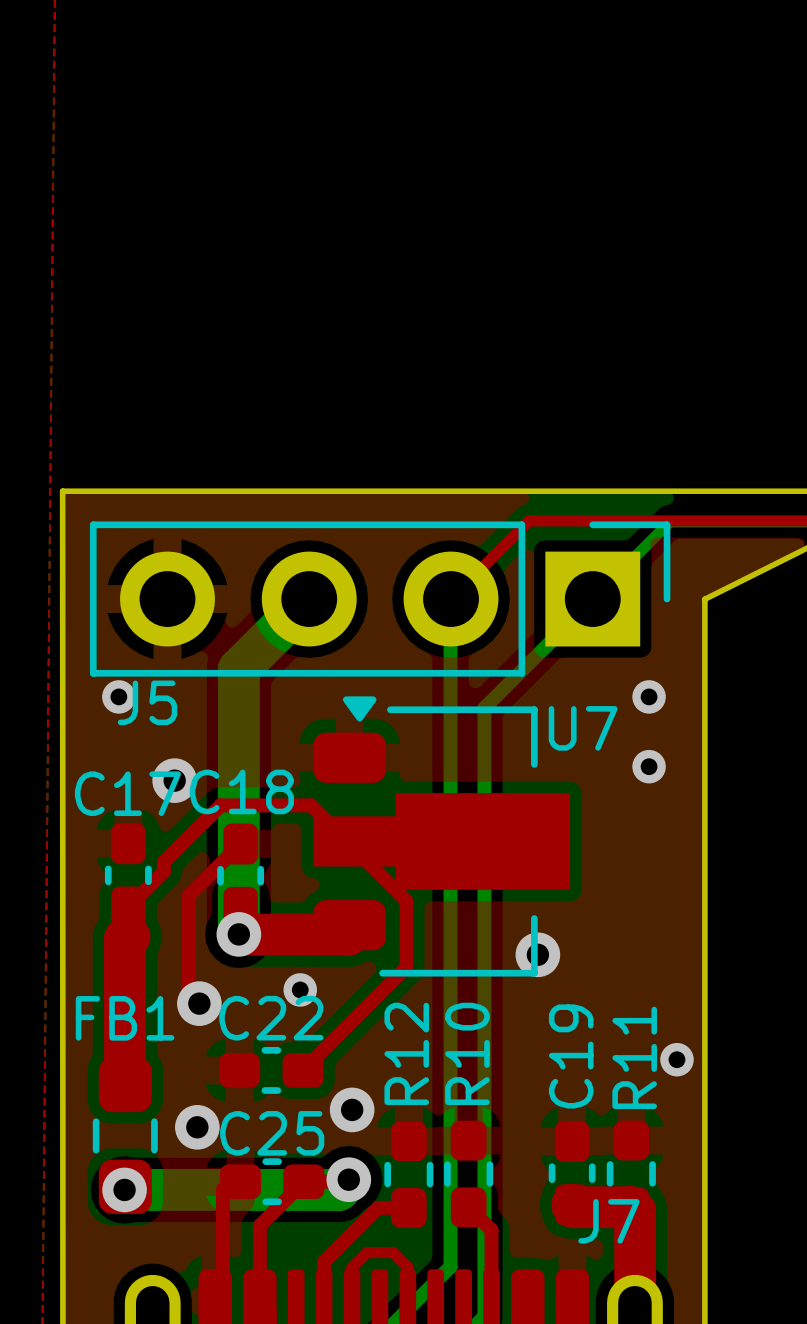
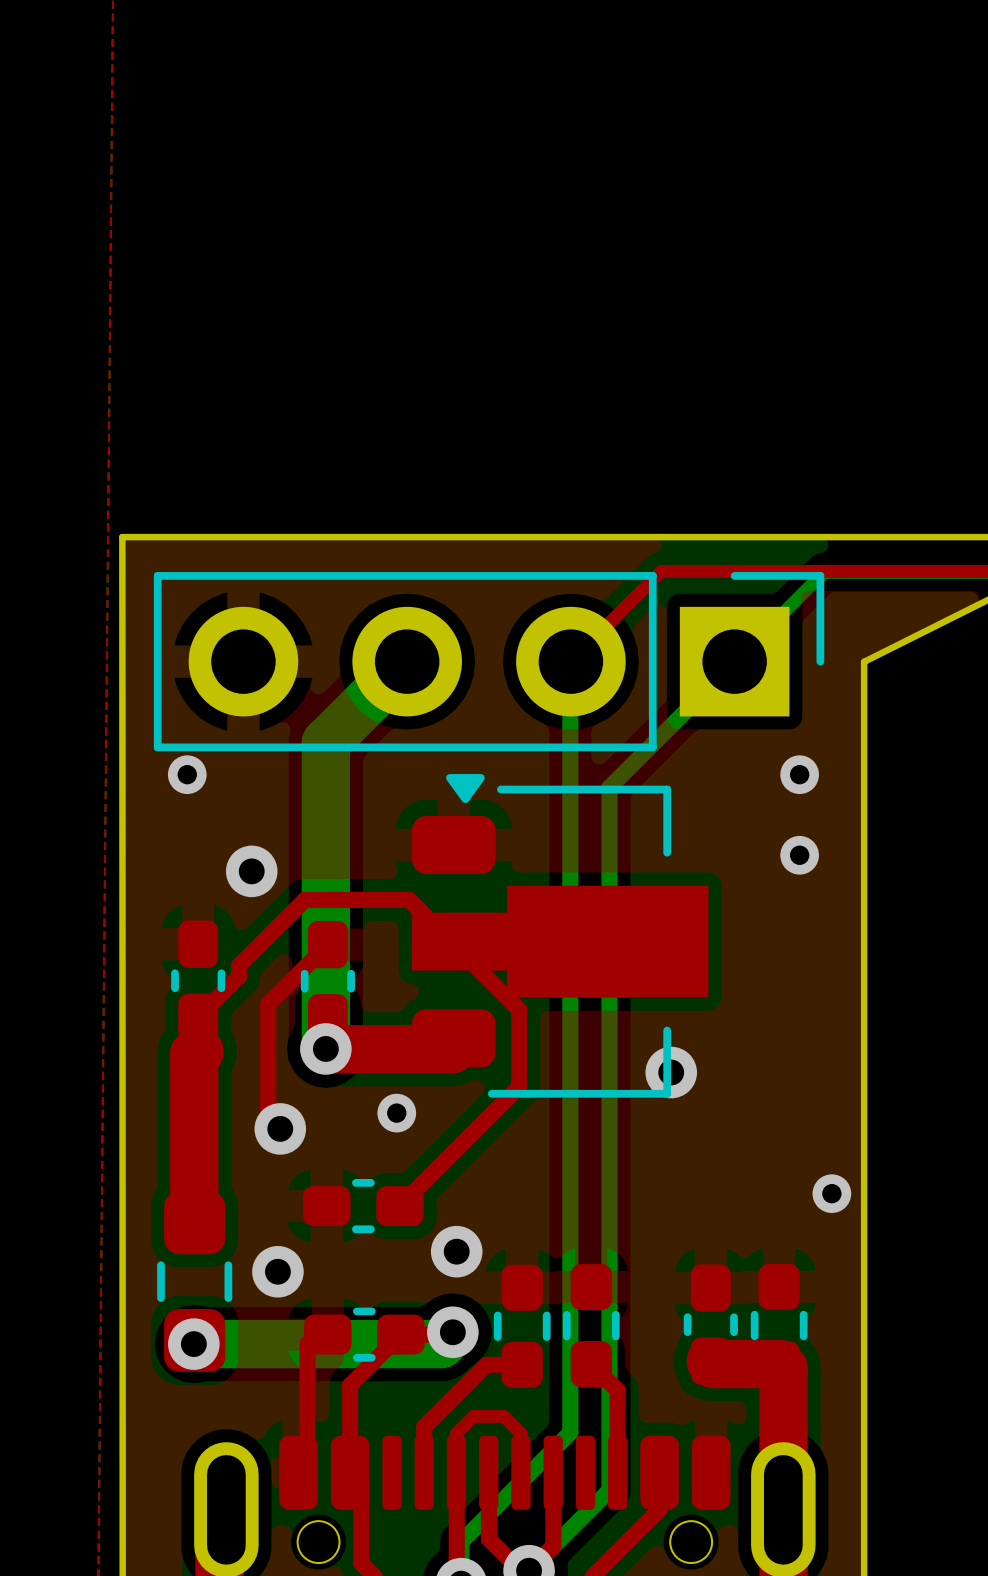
J5 name: J5 (147, 702) -> none
U7 name: U7 (583, 728) -> none
C18 name: C18 (241, 791) -> none
C17 name: C17 (127, 793) -> none
FB1 name: FB1 (125, 1018) -> none
C22 name: C22 (271, 1018) -> none
R12 name: R12 (406, 1053) -> none
R10 name: R10 (467, 1053) -> none
C19 name: C19 (571, 1056) -> none
R11 name: R11 (634, 1057) -> none
C25 name: C25 (272, 1133) -> none
J7 name: J7 (609, 1221) -> none

